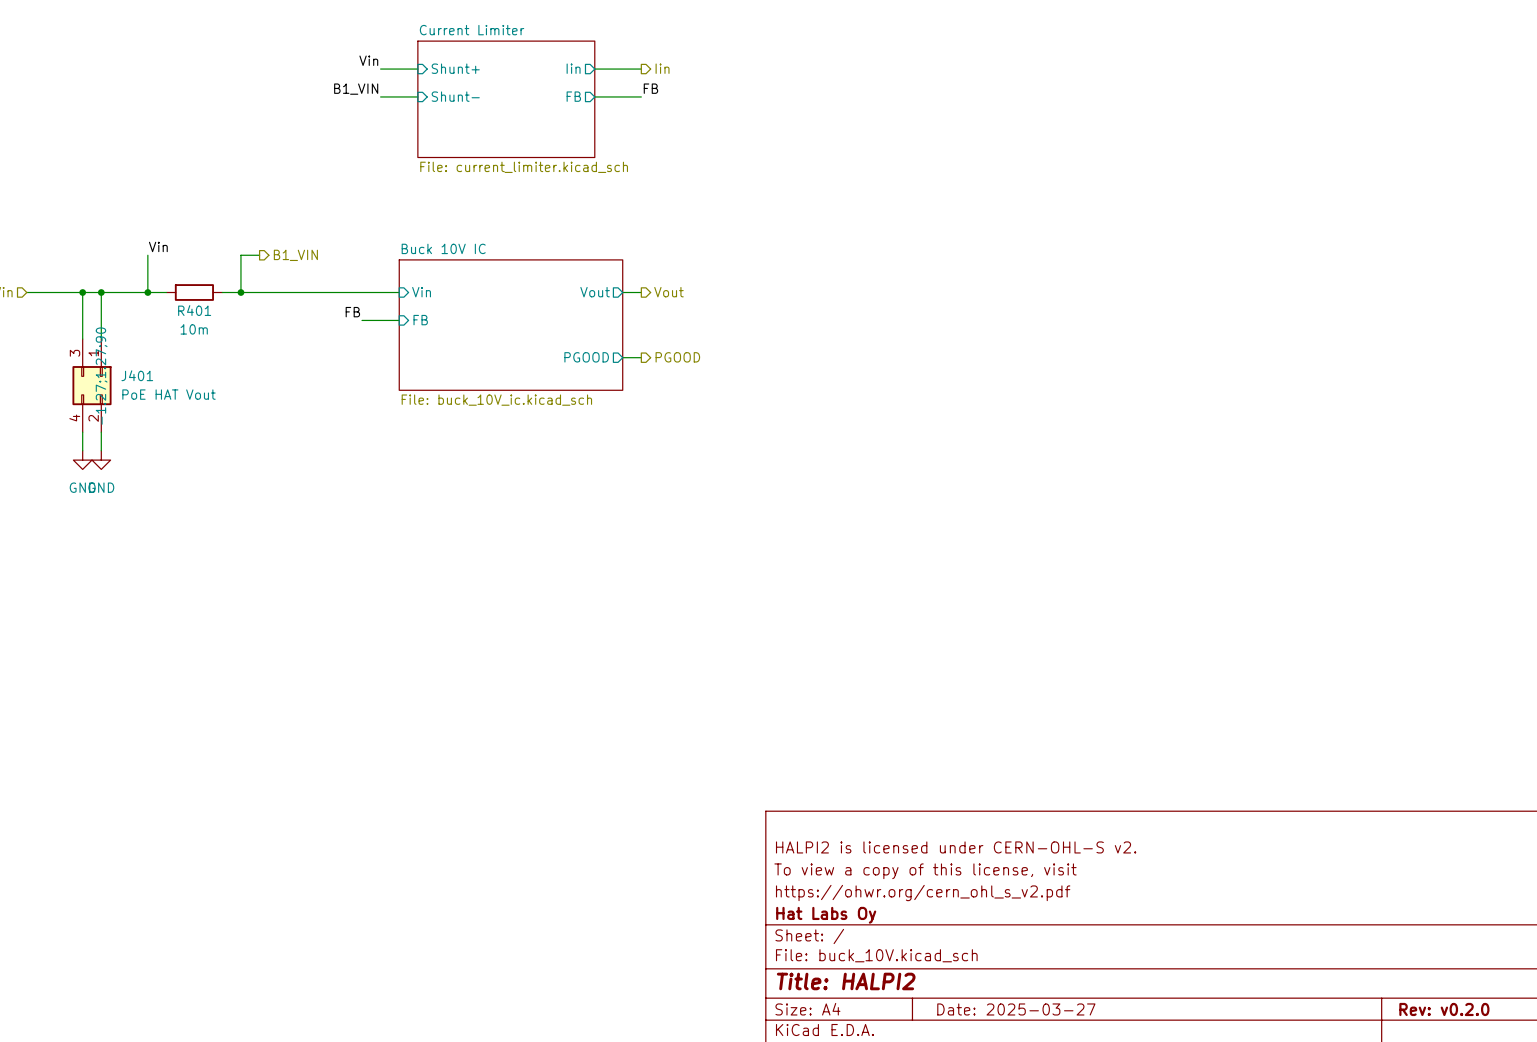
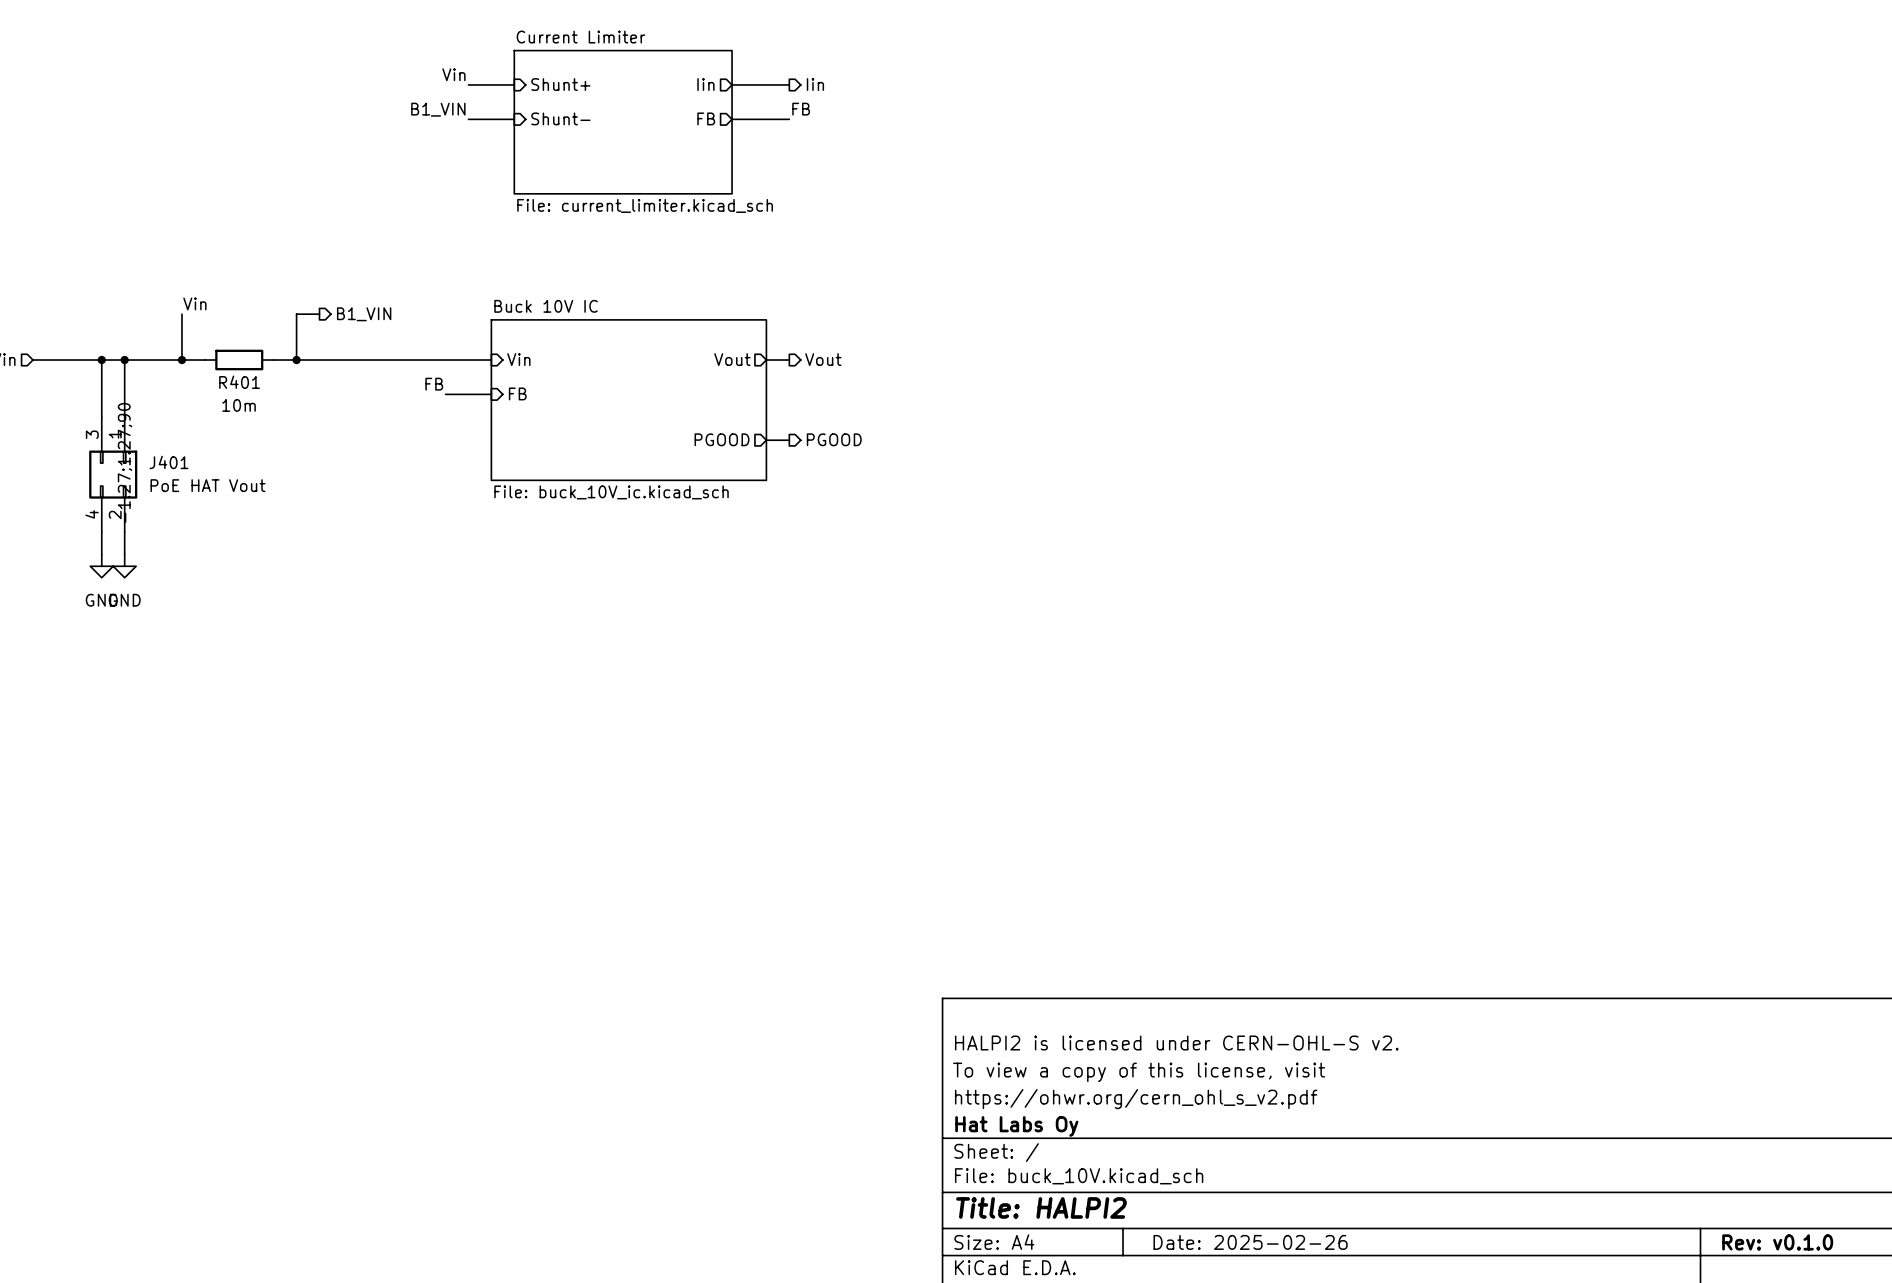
title block: Date: 2025-03-27 (1016, 1009) -> Date: 2025-02-26 (1250, 1242)
title block: Rev: v0.2.0 (1444, 1009) -> Rev: v0.1.0 (1777, 1242)

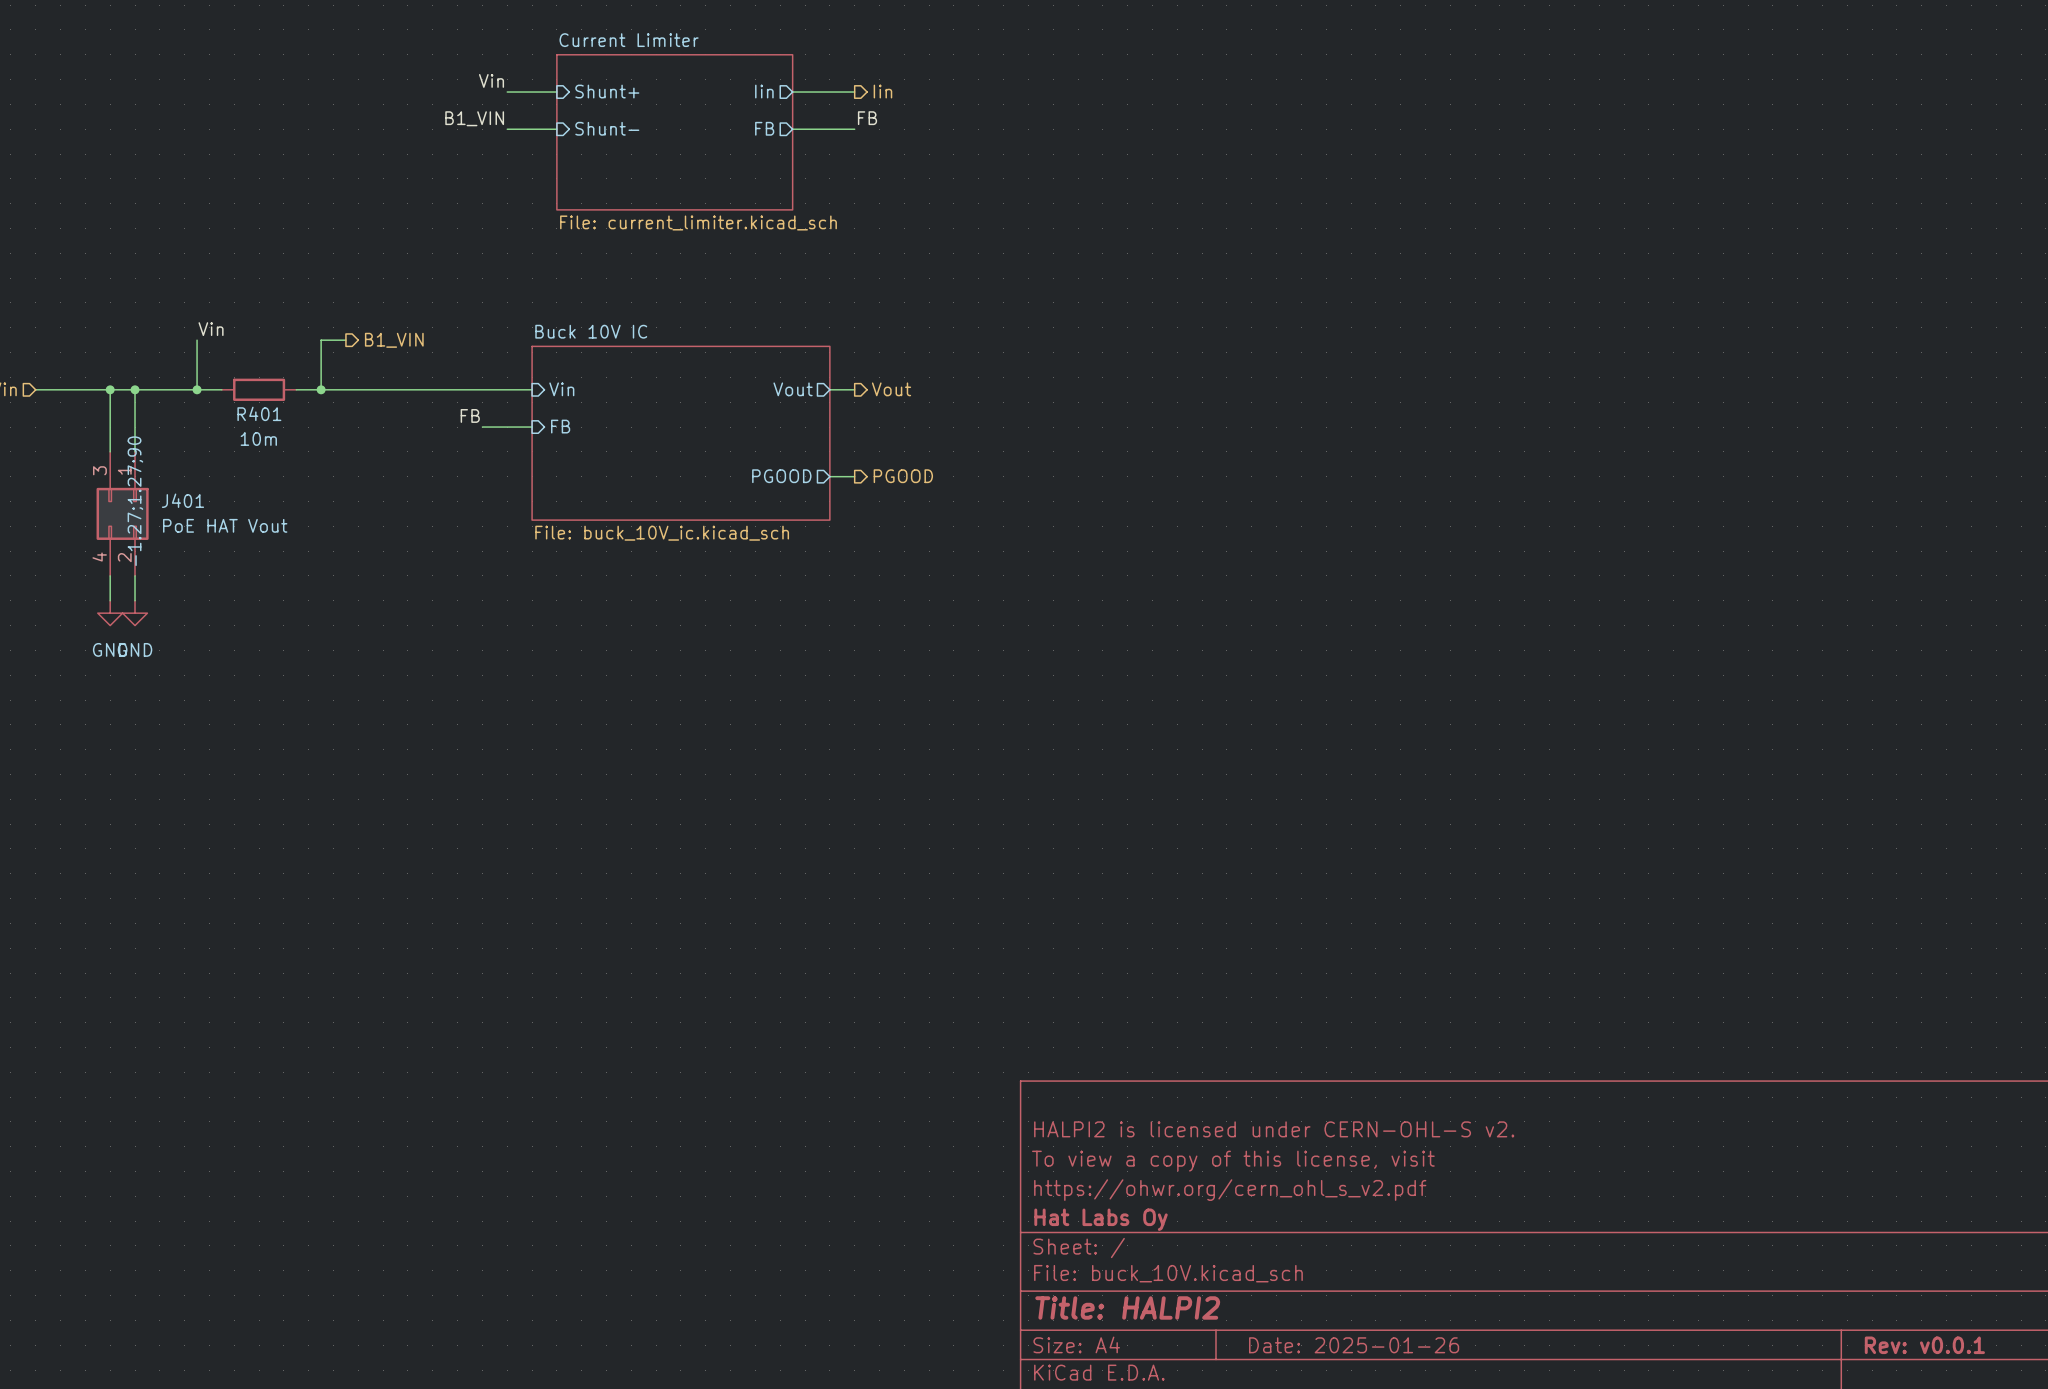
title block: Date: 2025-02-26 (1250, 1242) -> Date: 2025-01-26 (1354, 1345)
title block: Rev: v0.1.0 (1777, 1242) -> Rev: v0.0.1 (1924, 1345)

